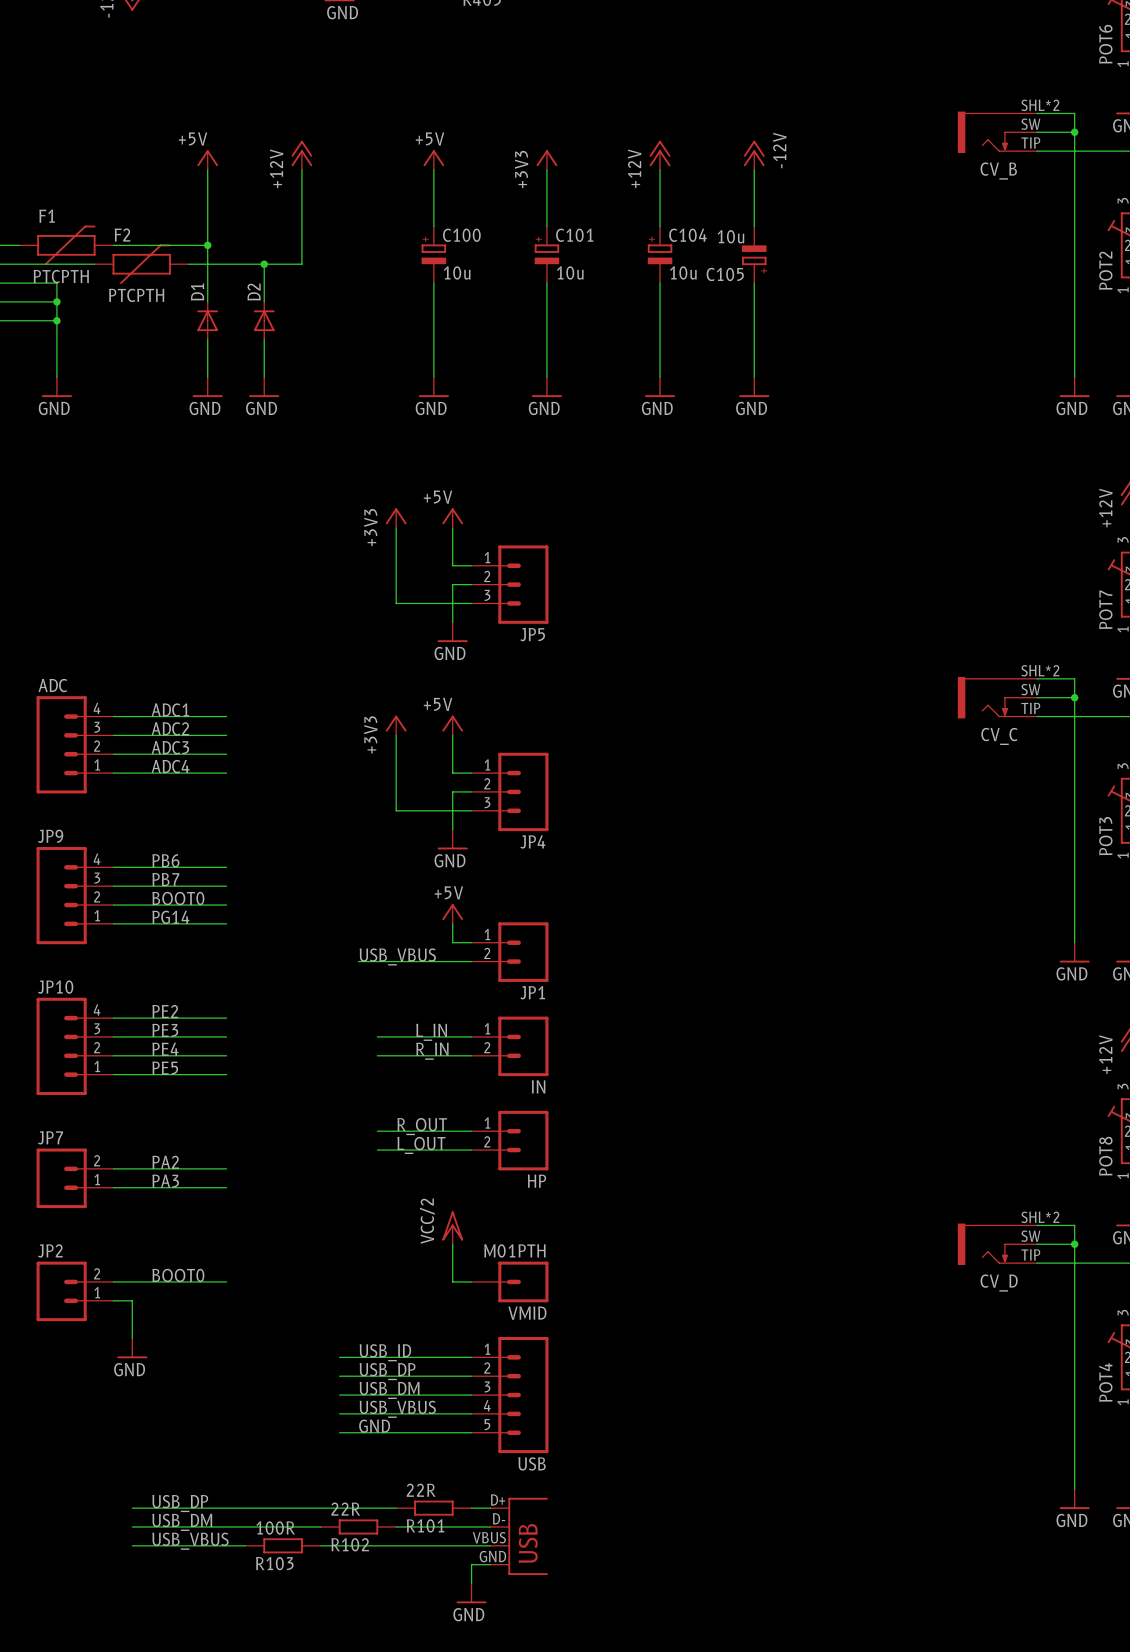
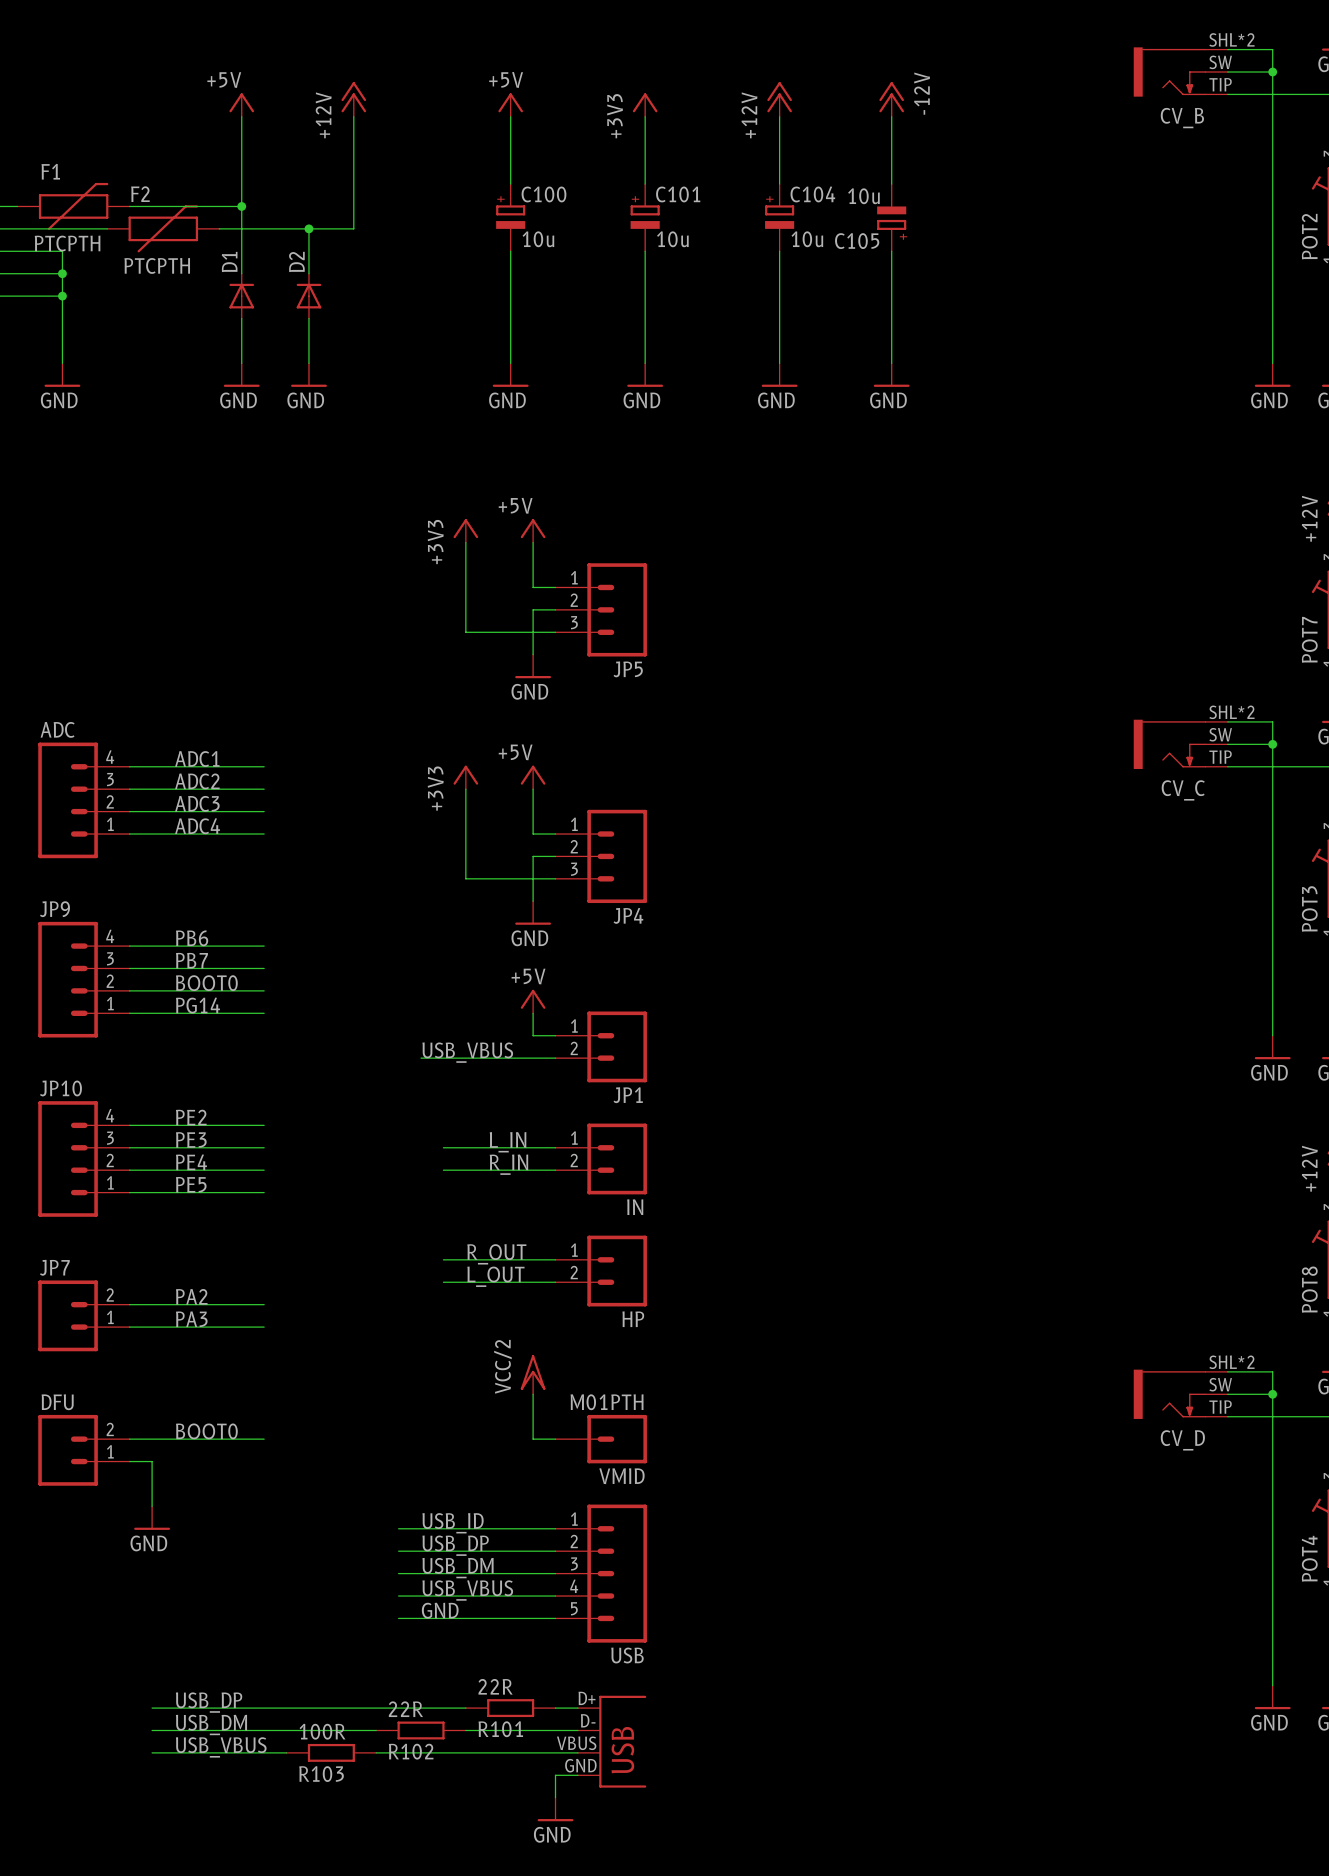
JP2 name: JP2 (50, 1250) -> DFU (57, 1402)

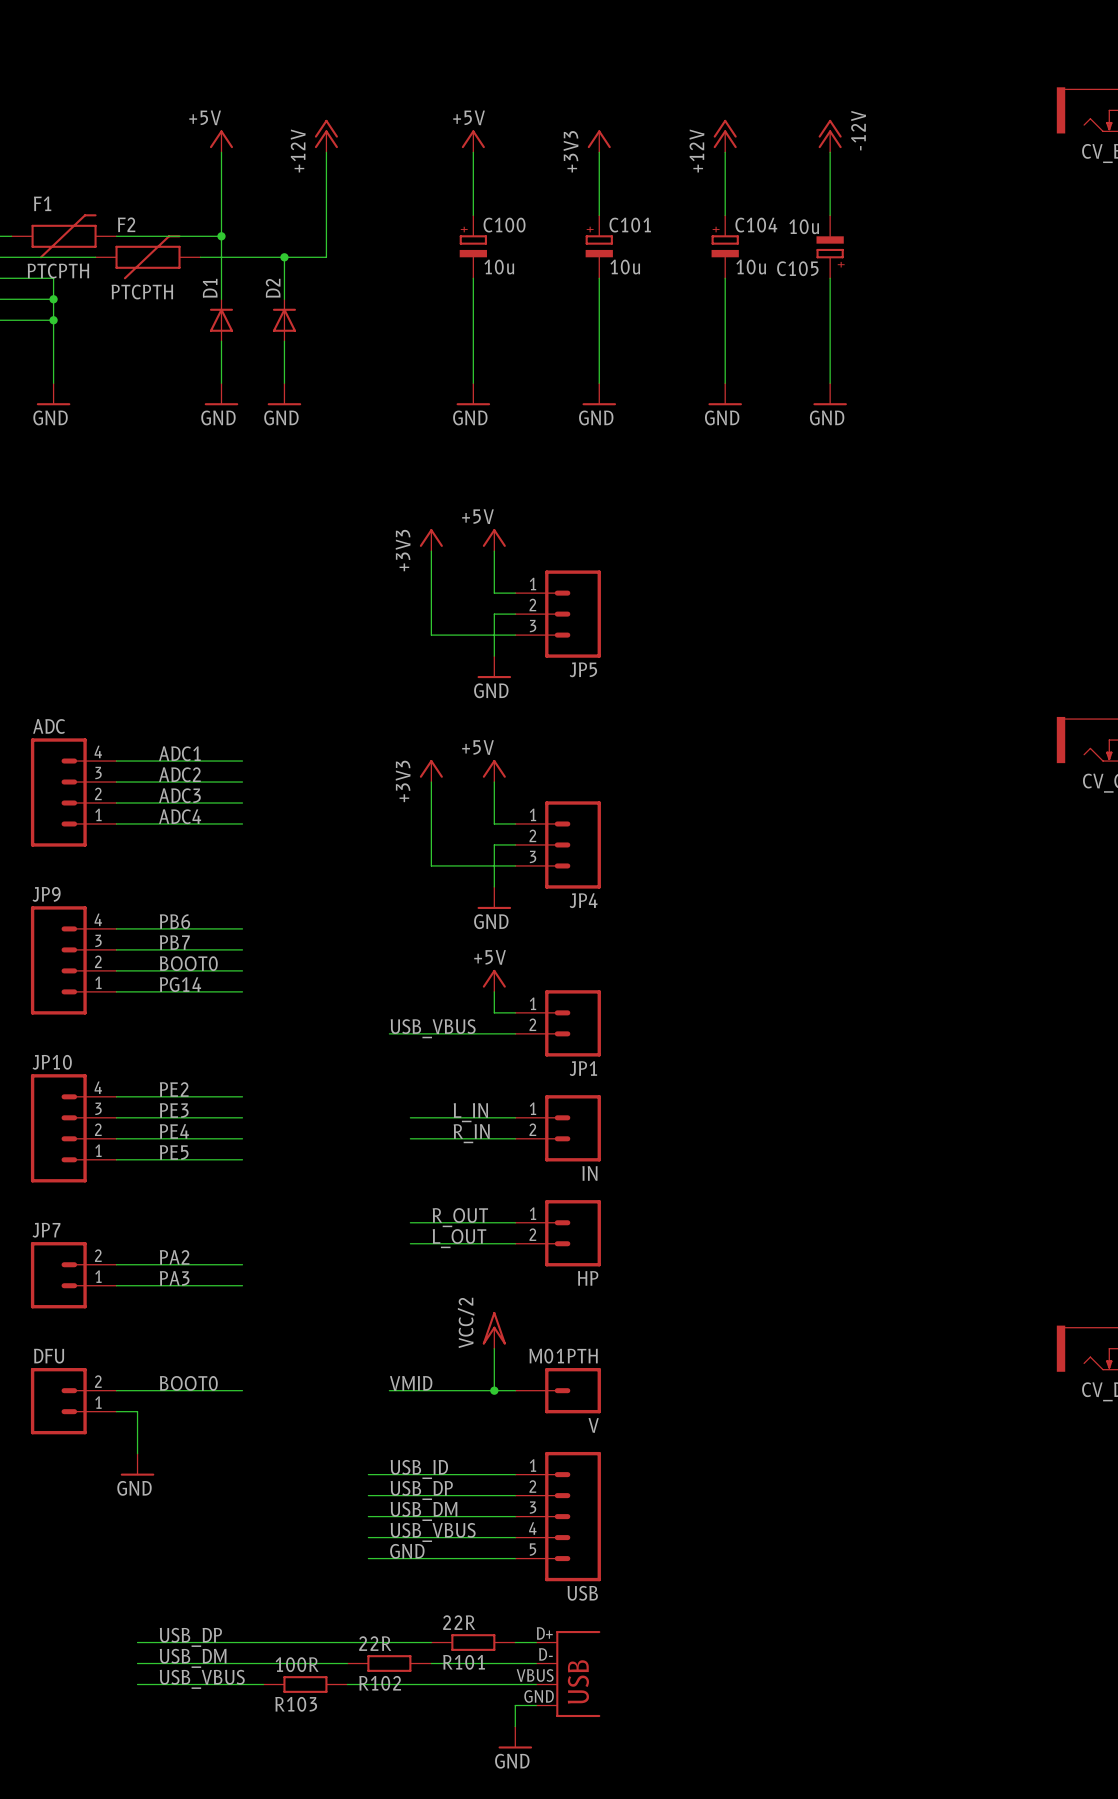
label: none -> VMID (411, 1383)
wire: none -> (389, 1390) (494, 1390)
junction: none -> (494, 1390)
VMID name: VMID (621, 1476) -> V (593, 1425)

